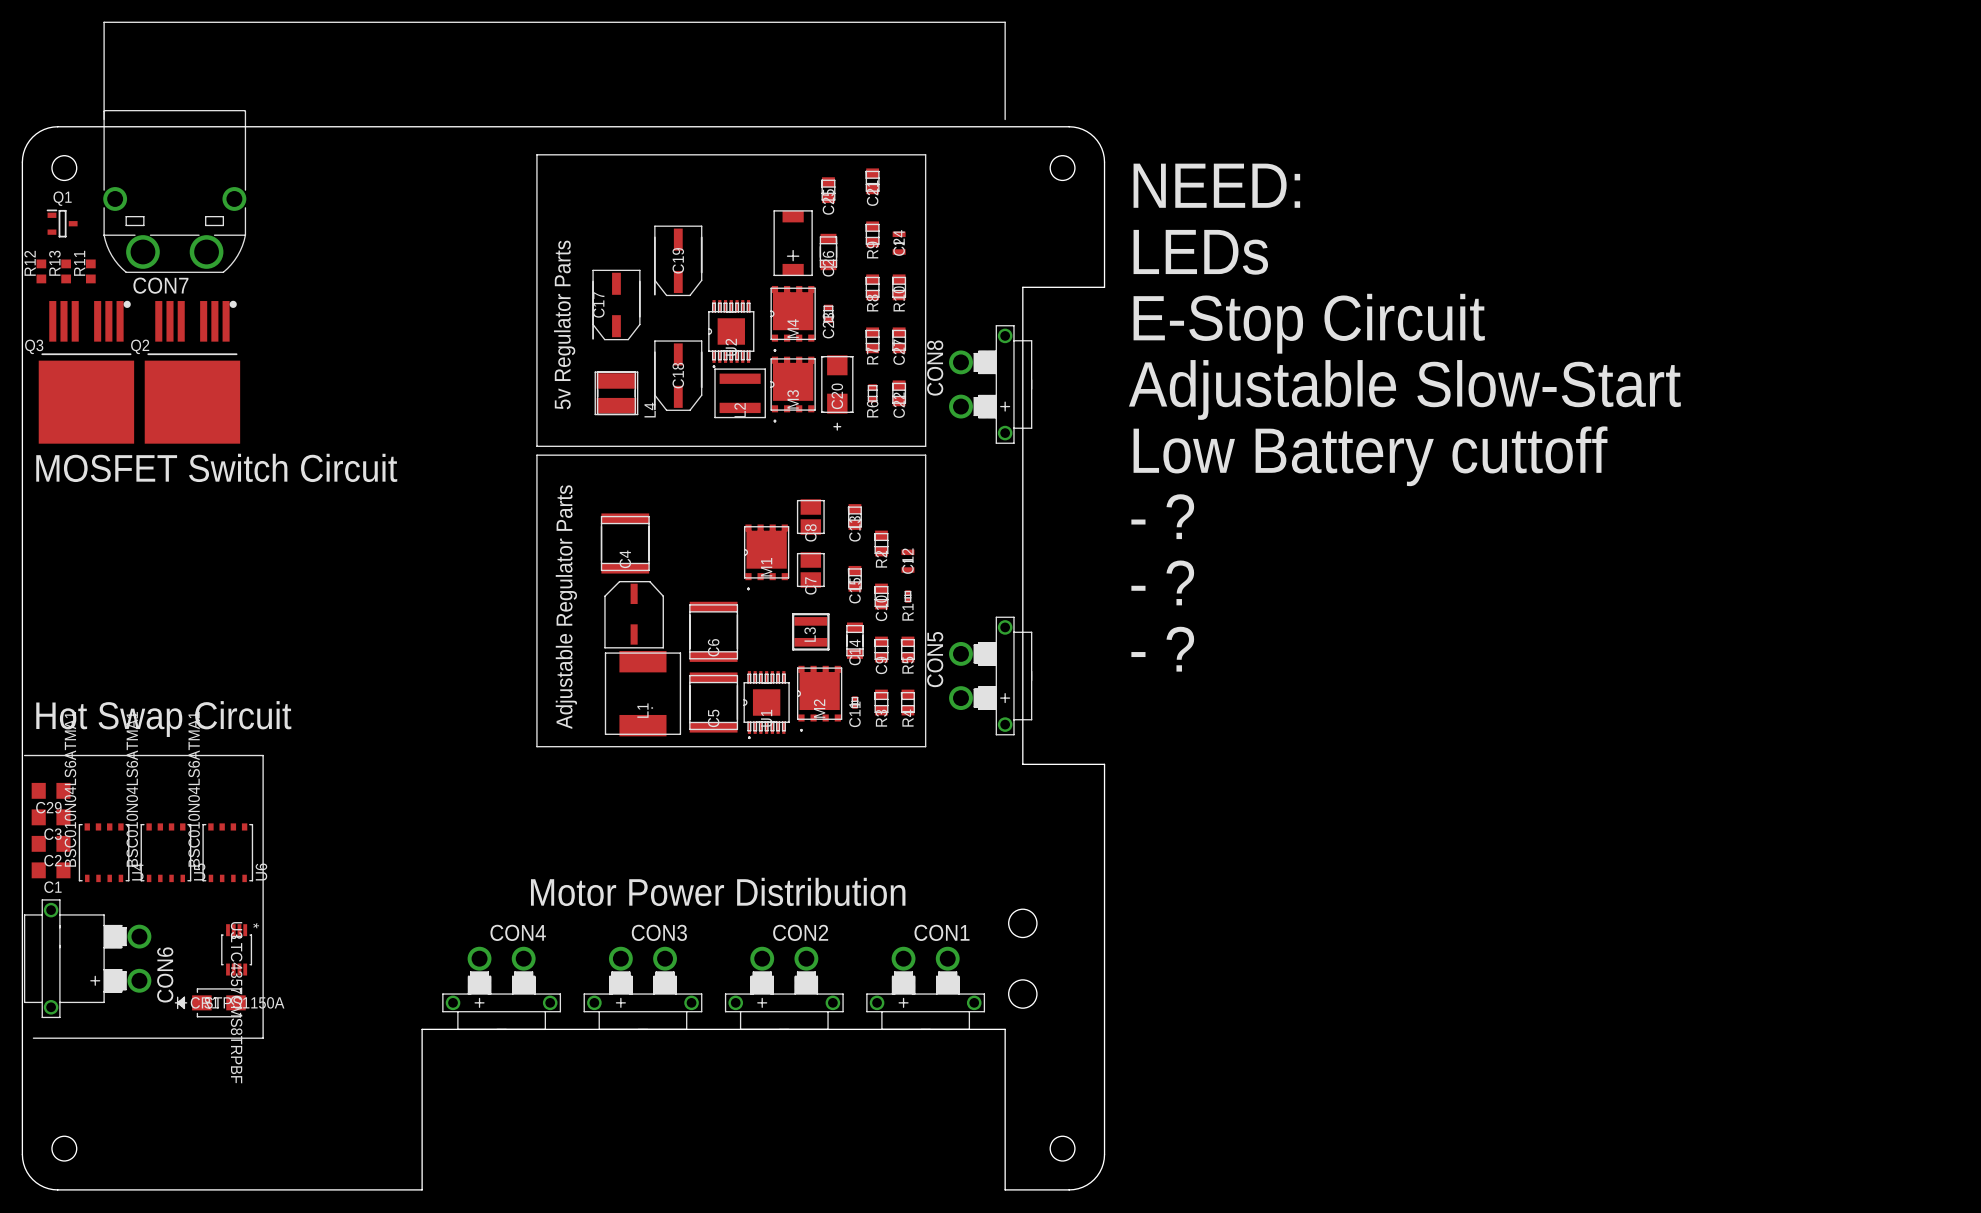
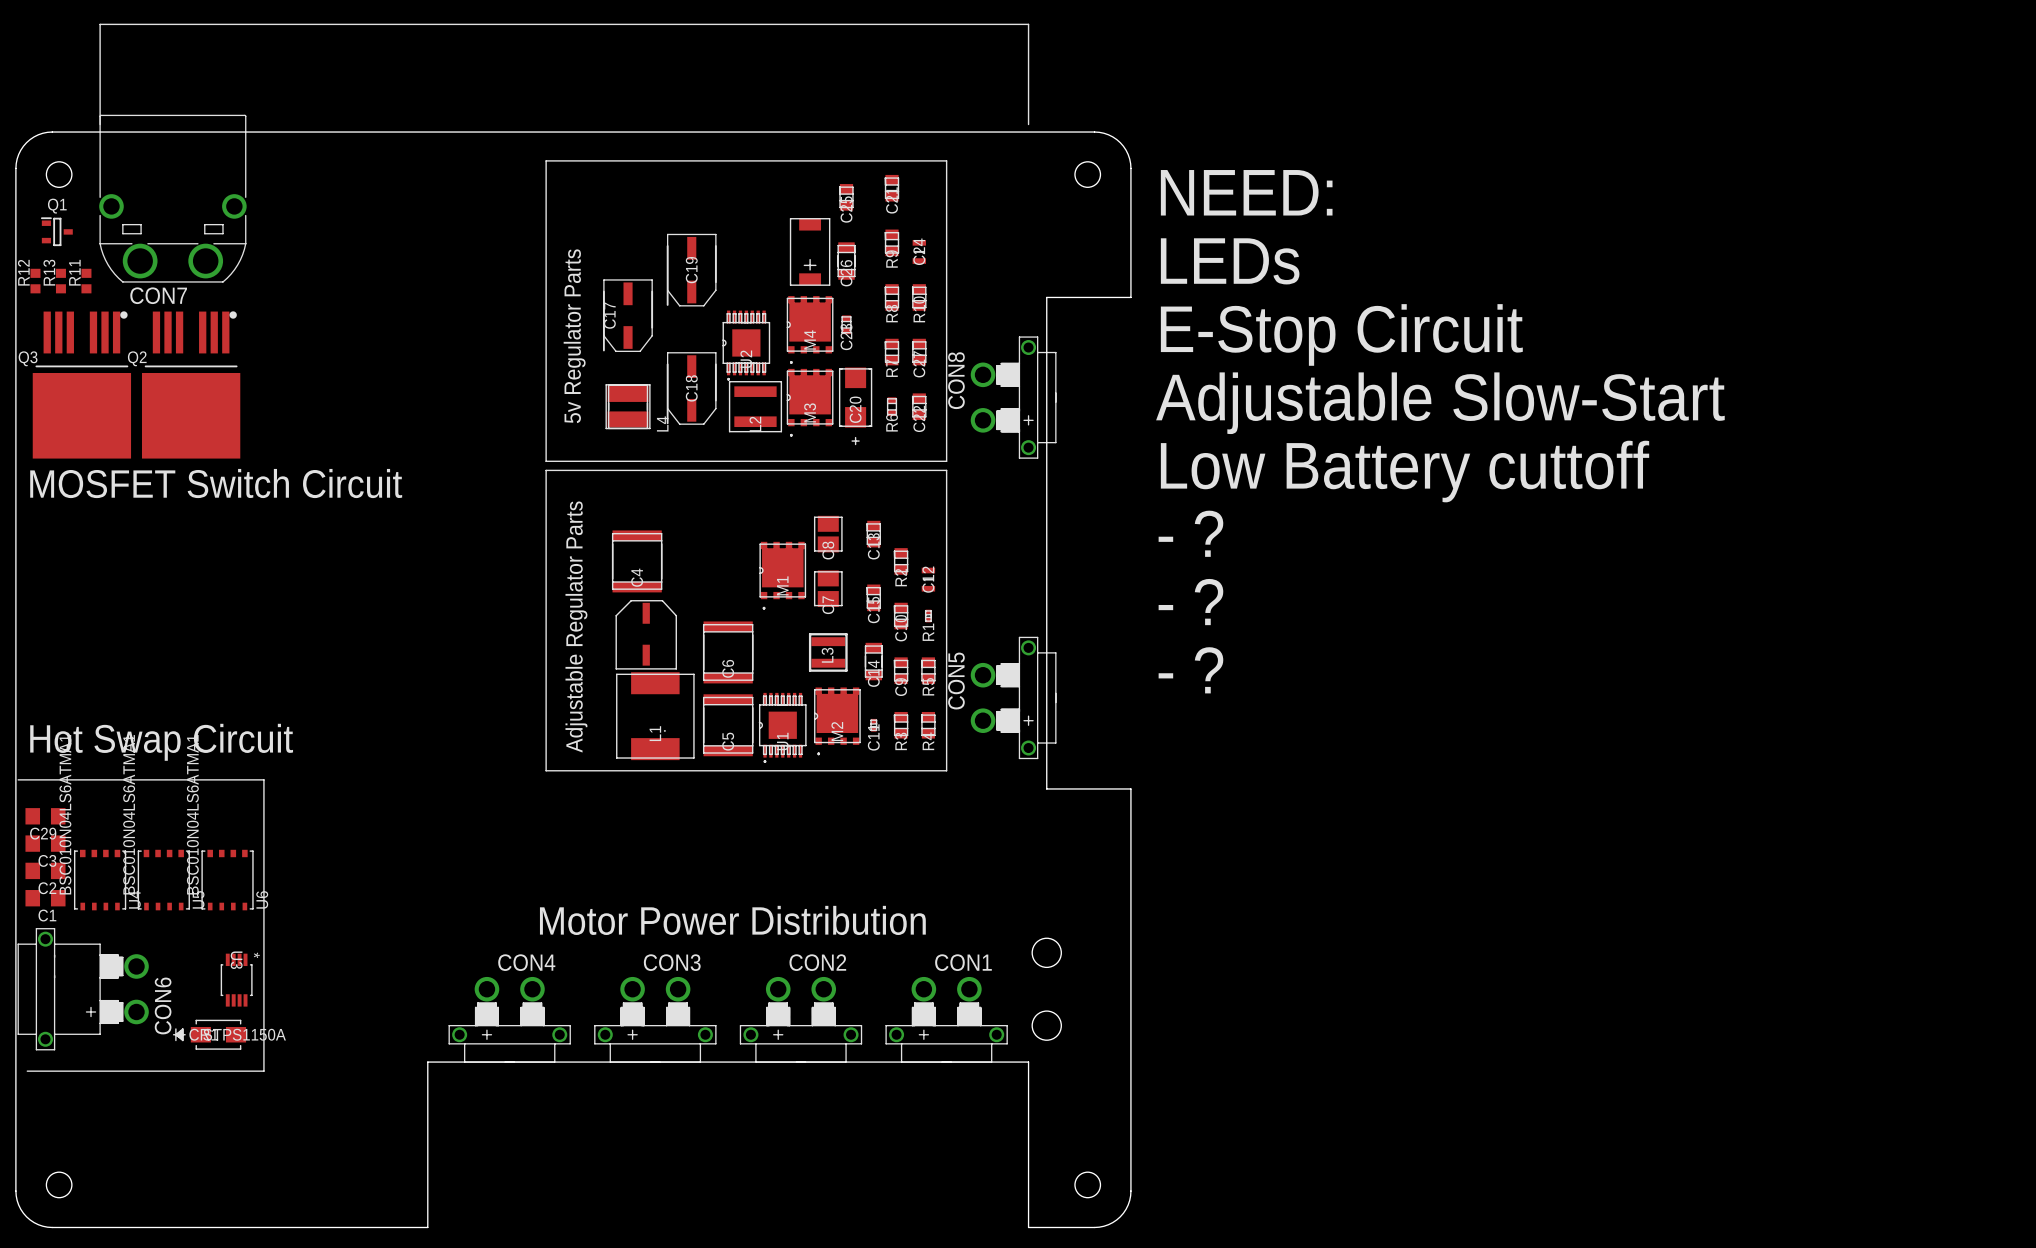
U3 value: LTC4357CMS8TRPBF (236, 1009) -> none

